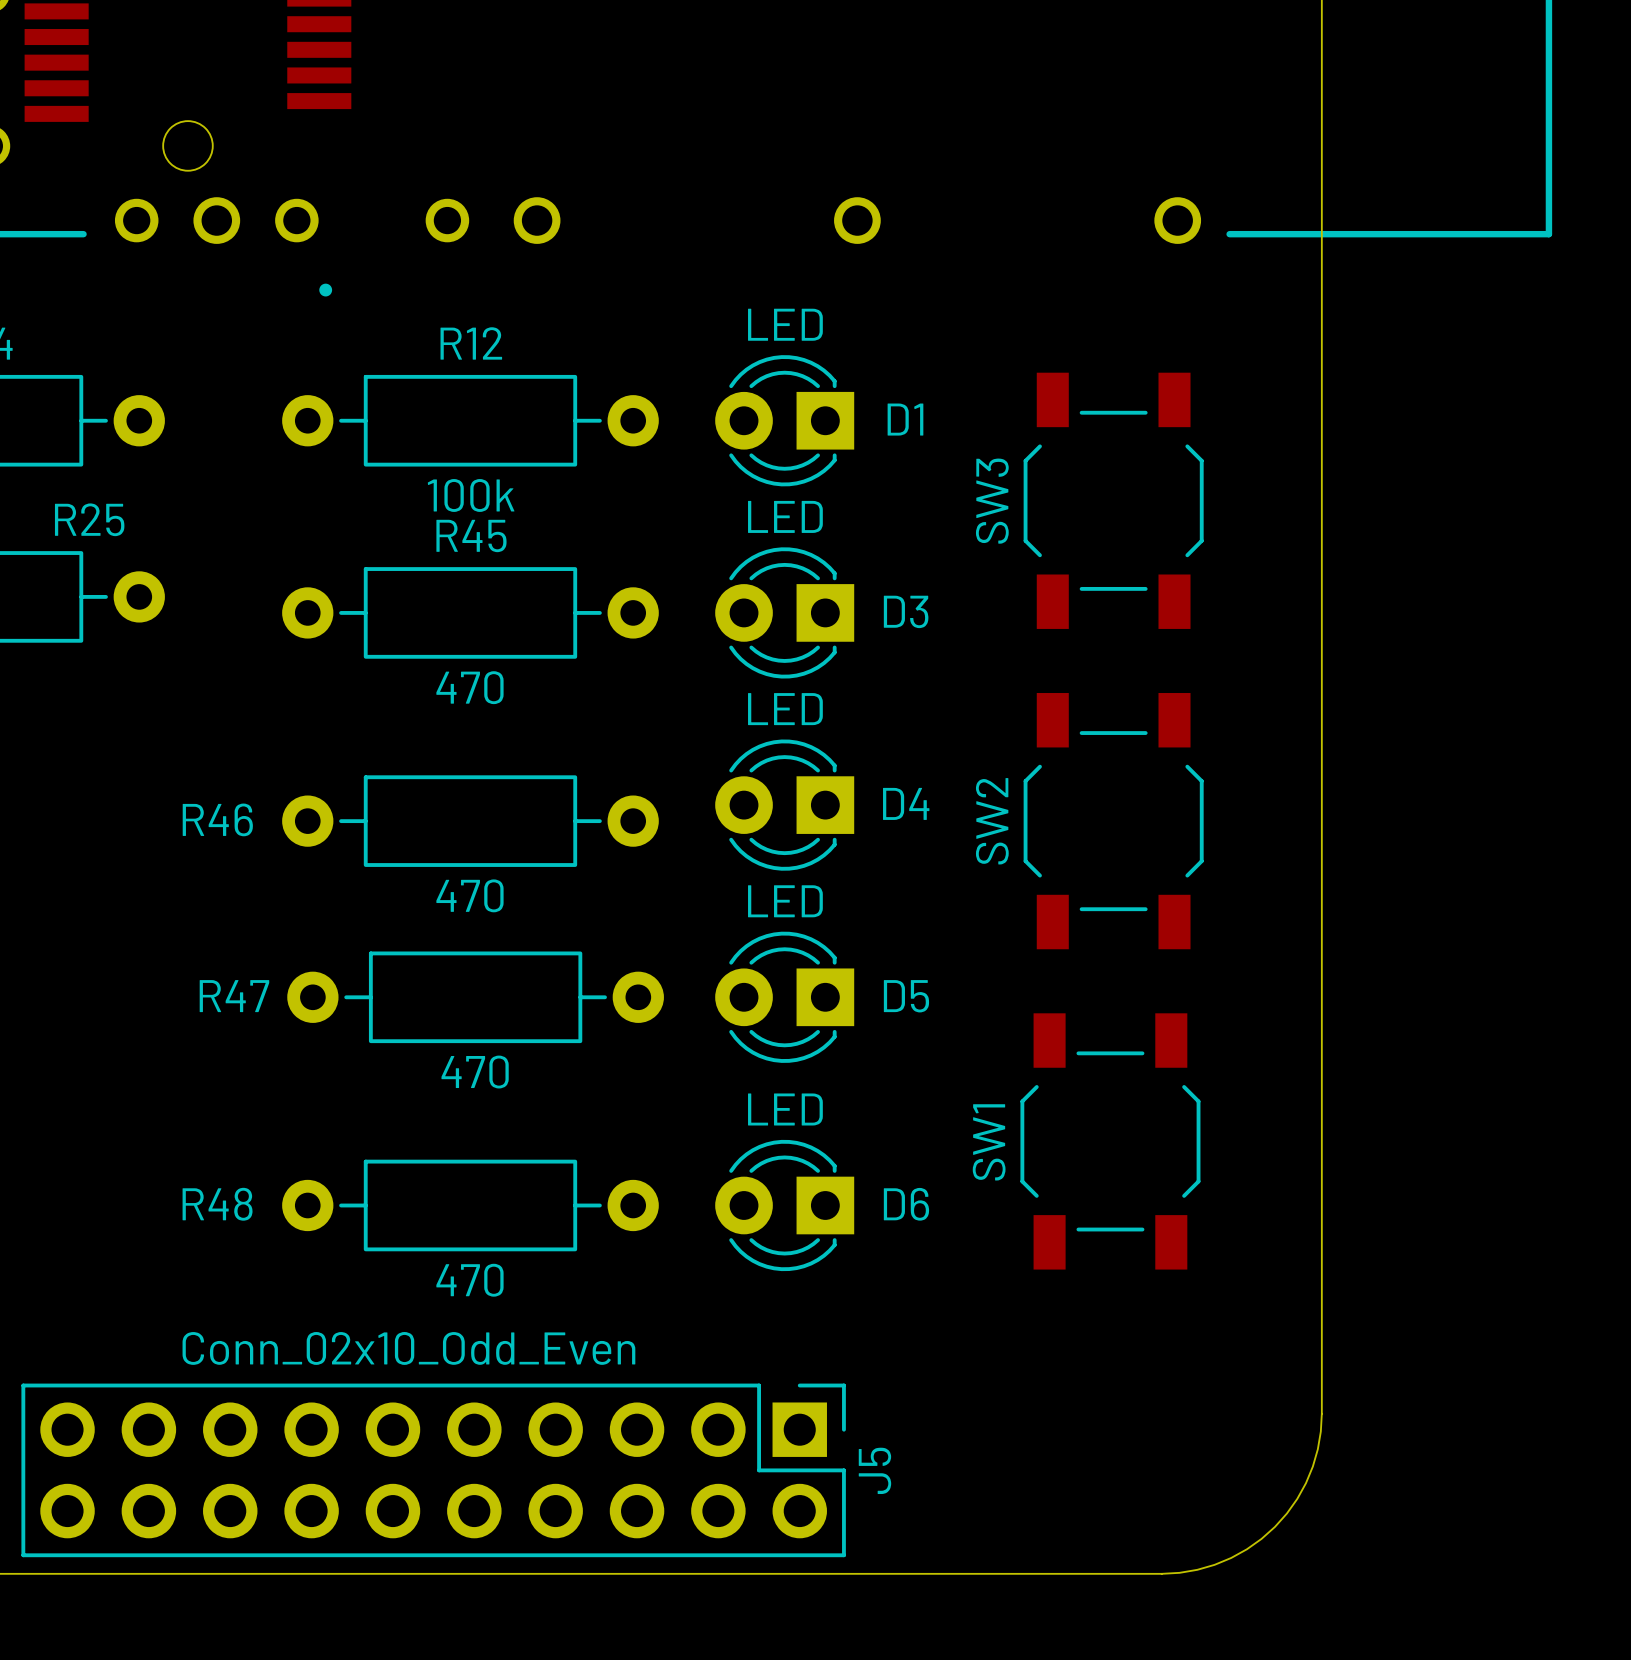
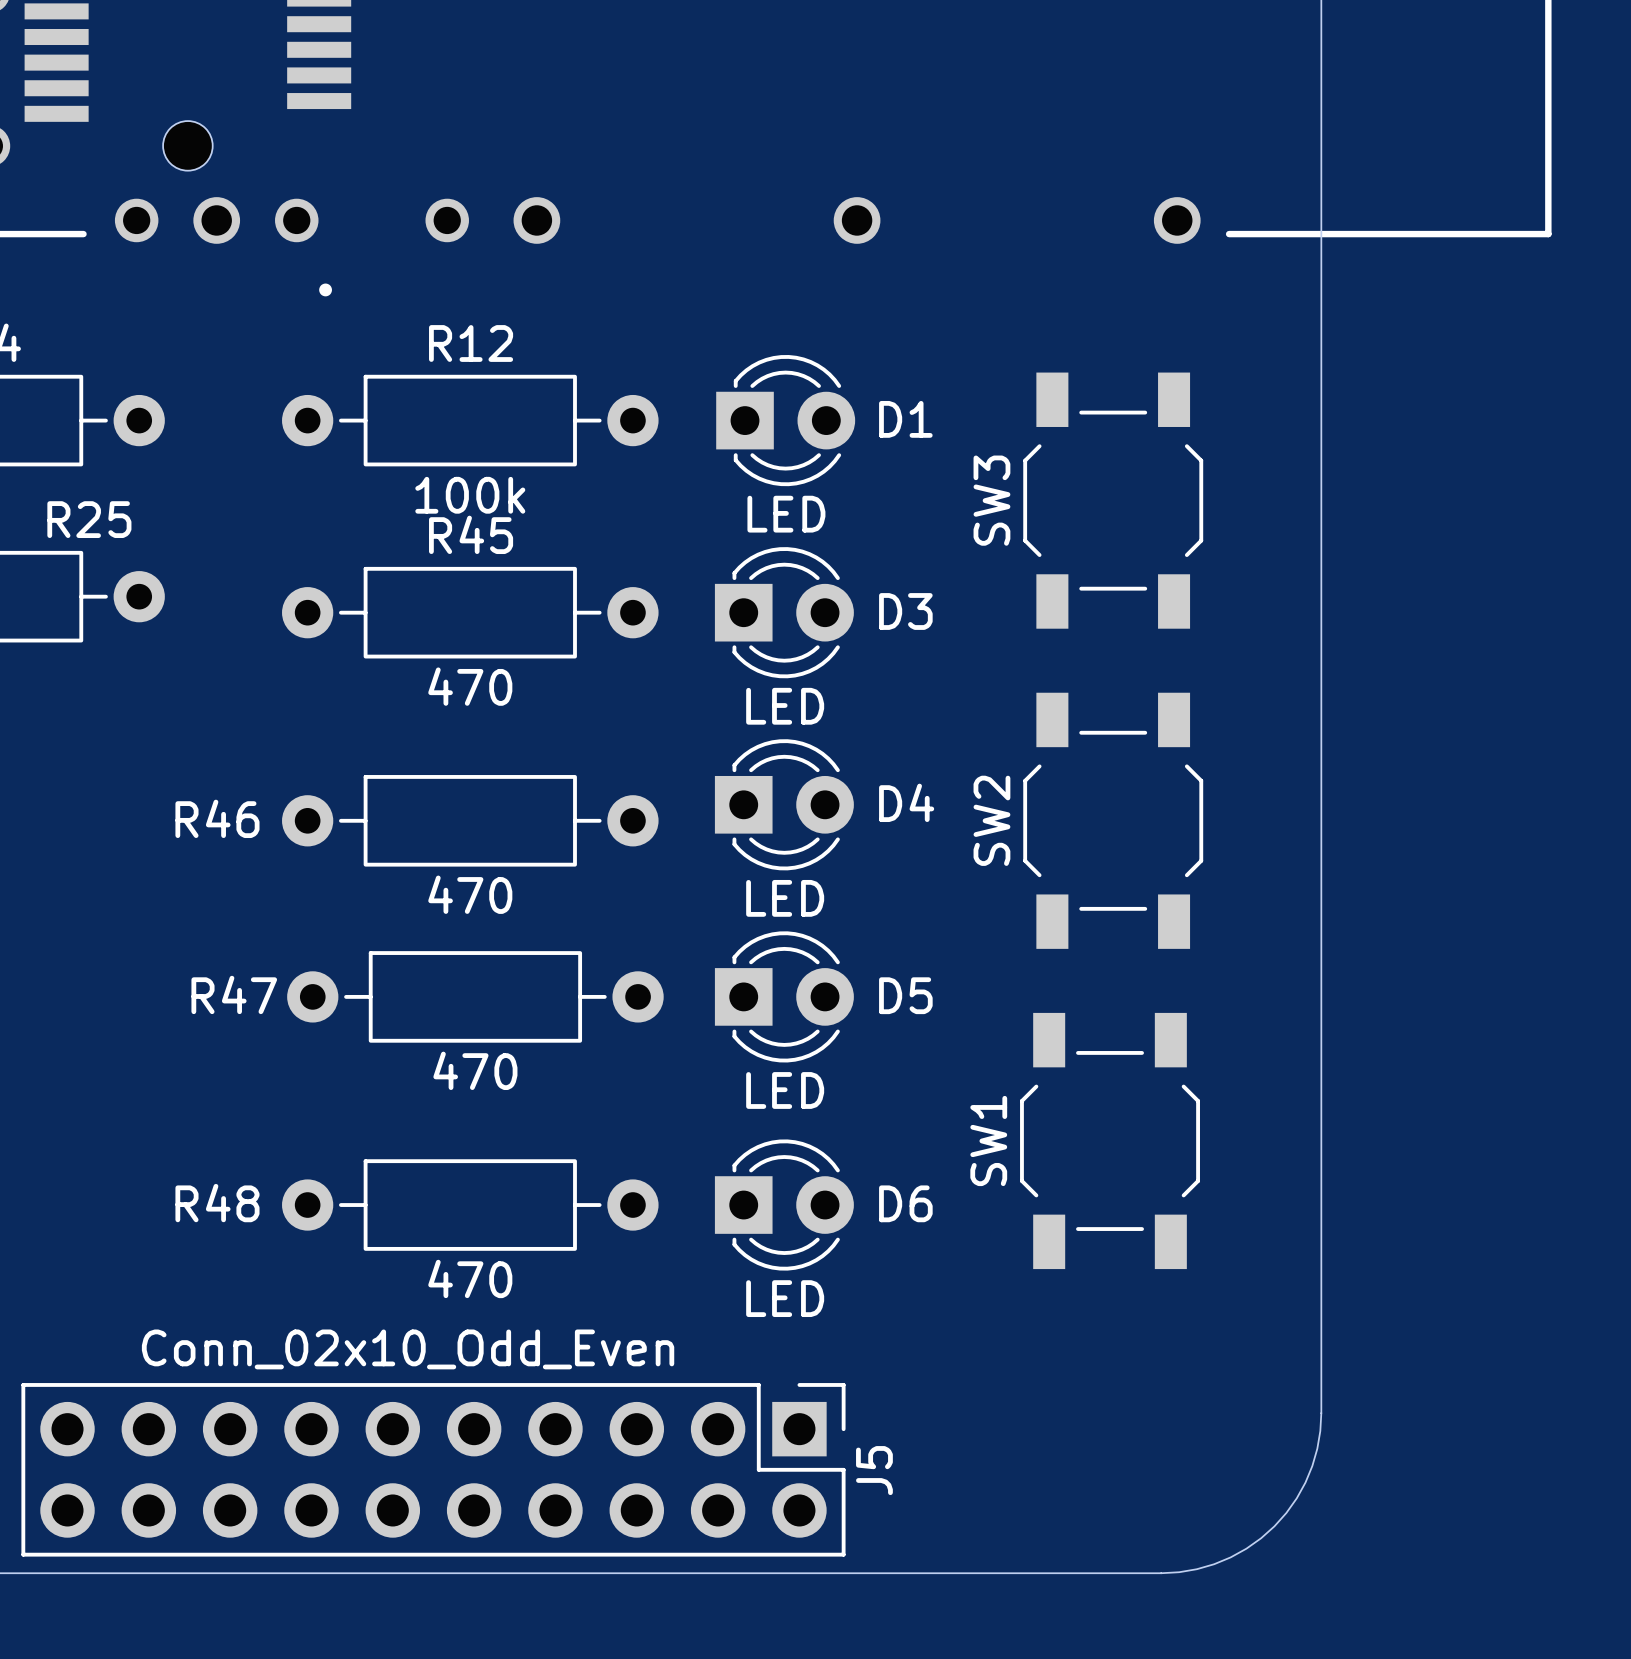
D1 rotation: 0° (784, 420) -> 180° (785, 420)
D3 rotation: 0° (784, 612) -> 180° (784, 612)
D4 rotation: 0° (784, 805) -> 180° (784, 804)
D5 rotation: 0° (784, 997) -> 180° (784, 996)
D6 rotation: 0° (784, 1205) -> 180° (784, 1205)

